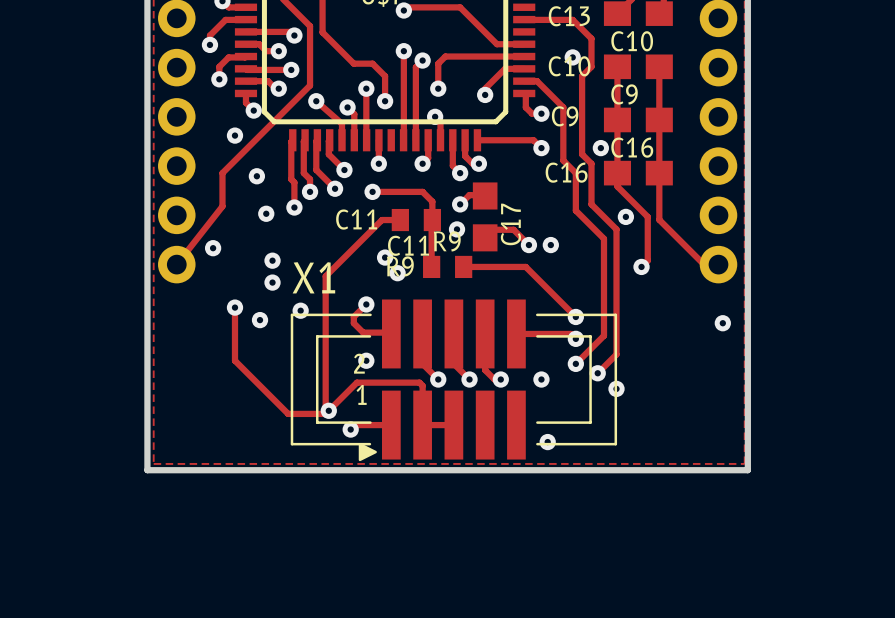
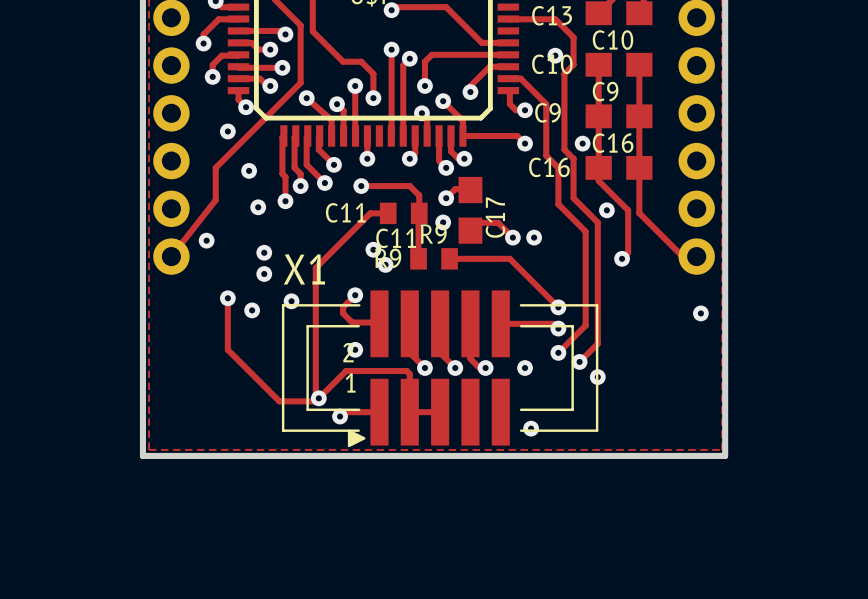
track: none -> (443, 101) (462, 120) (462, 136)
via: none -> (443, 101)

